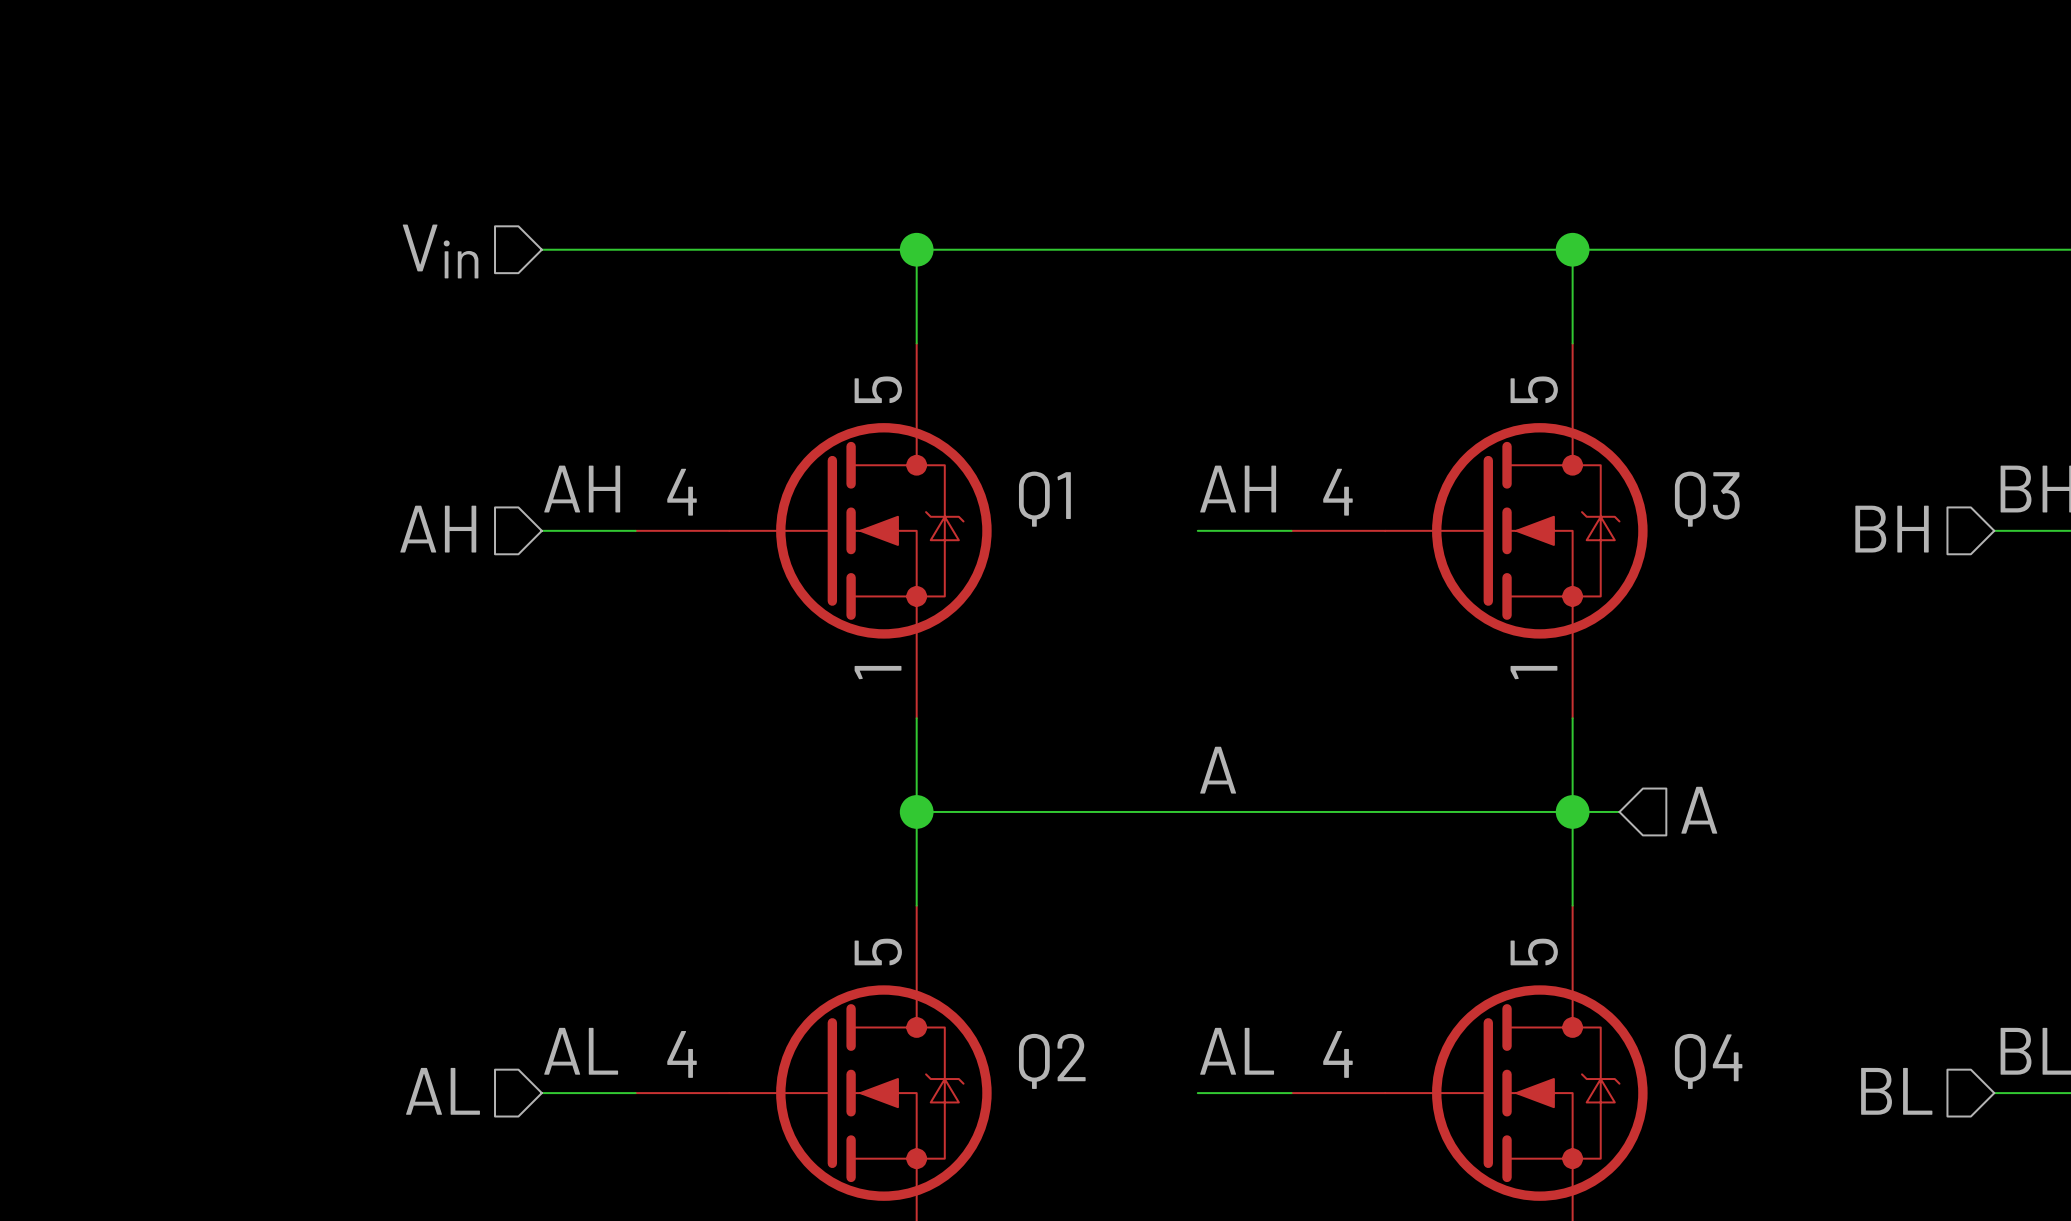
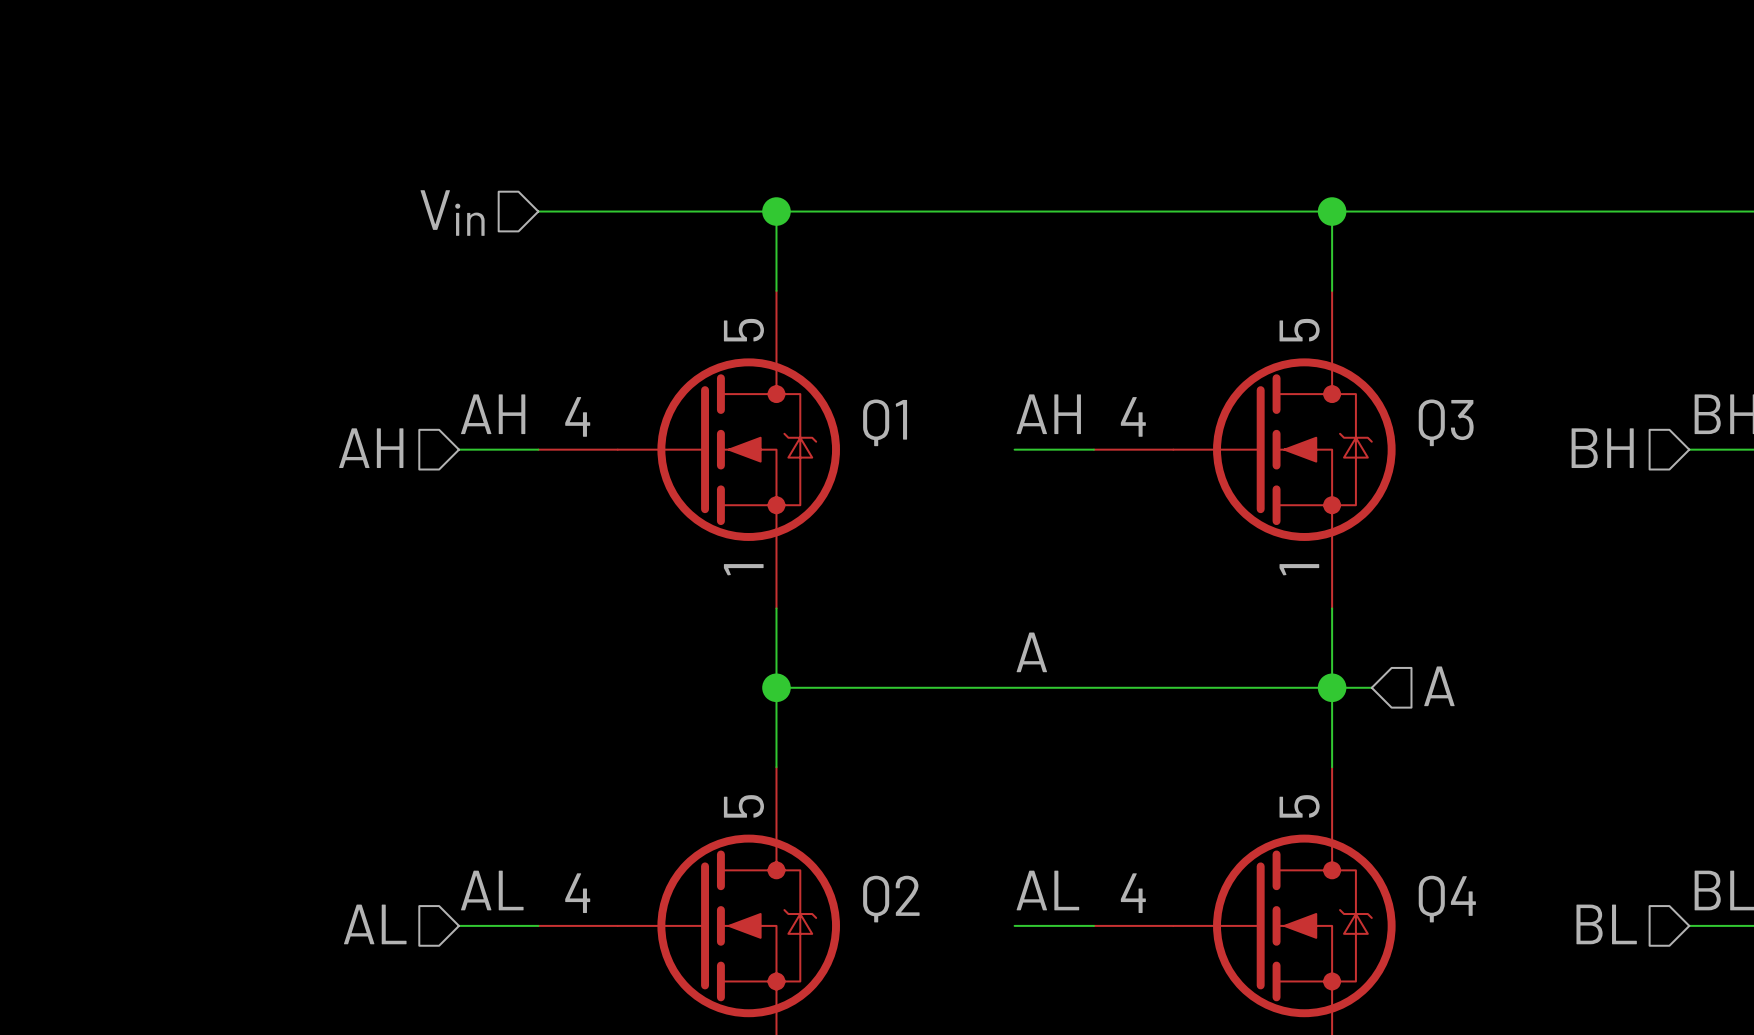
wire: (541, 249) (635, 249) -> none
hierarchical label position: Vin (440, 251) -> Vin (452, 213)

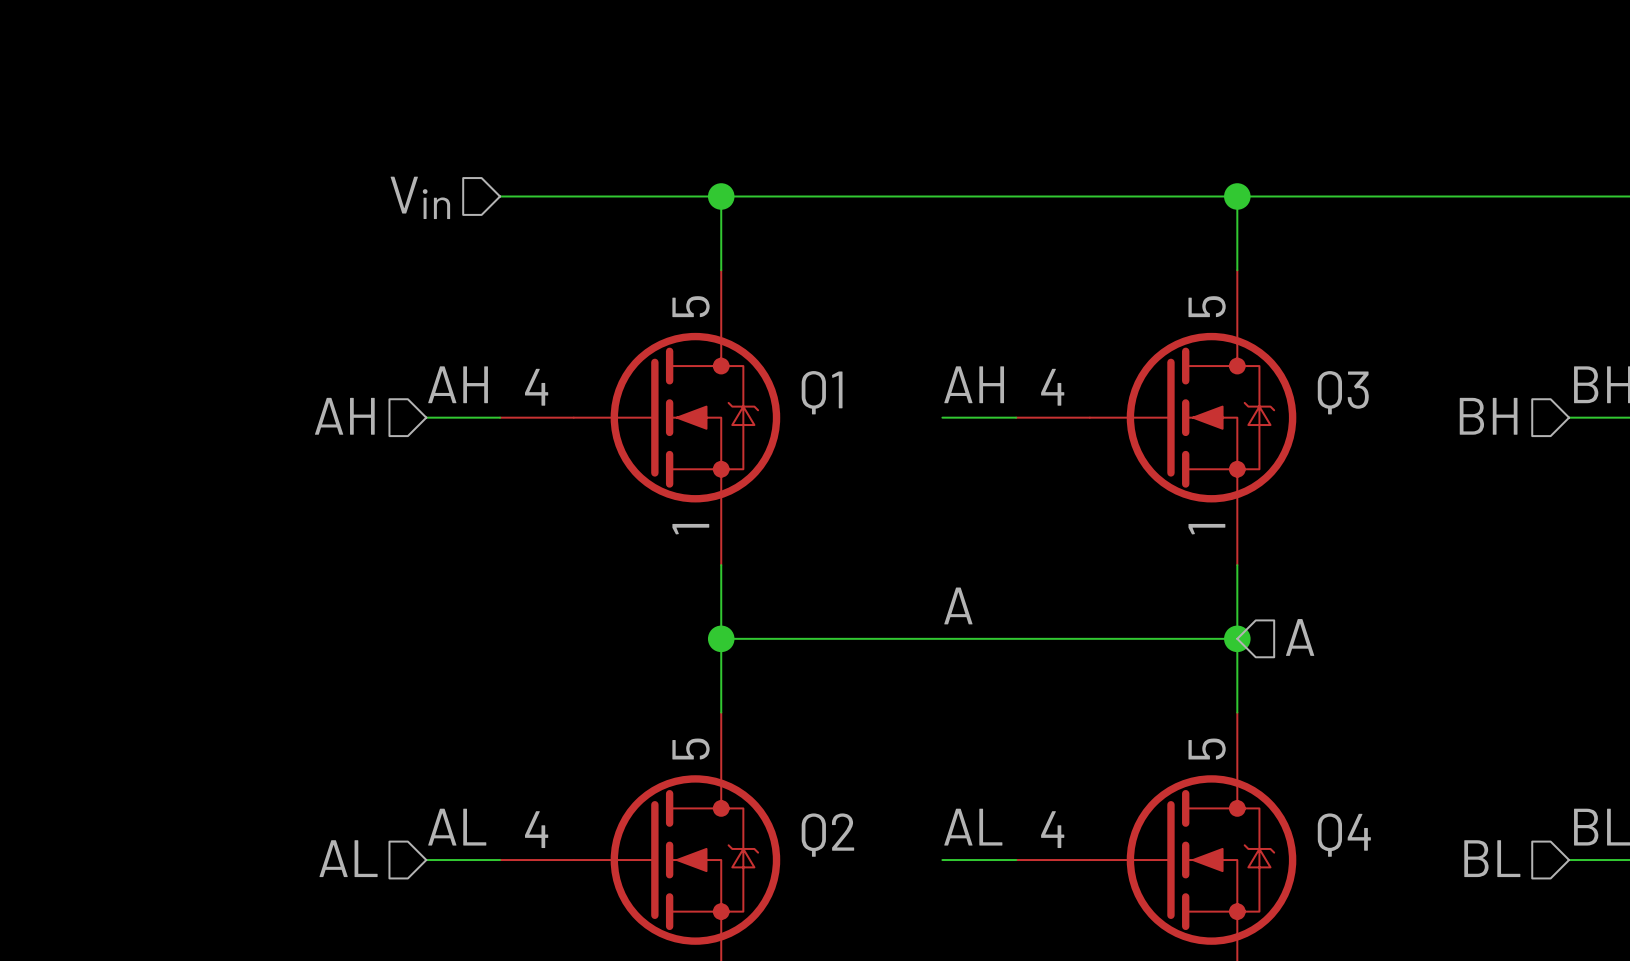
hierarchical label position: A (1439, 686) -> A (1300, 637)
wire: (1332, 687) (1371, 687) -> none

